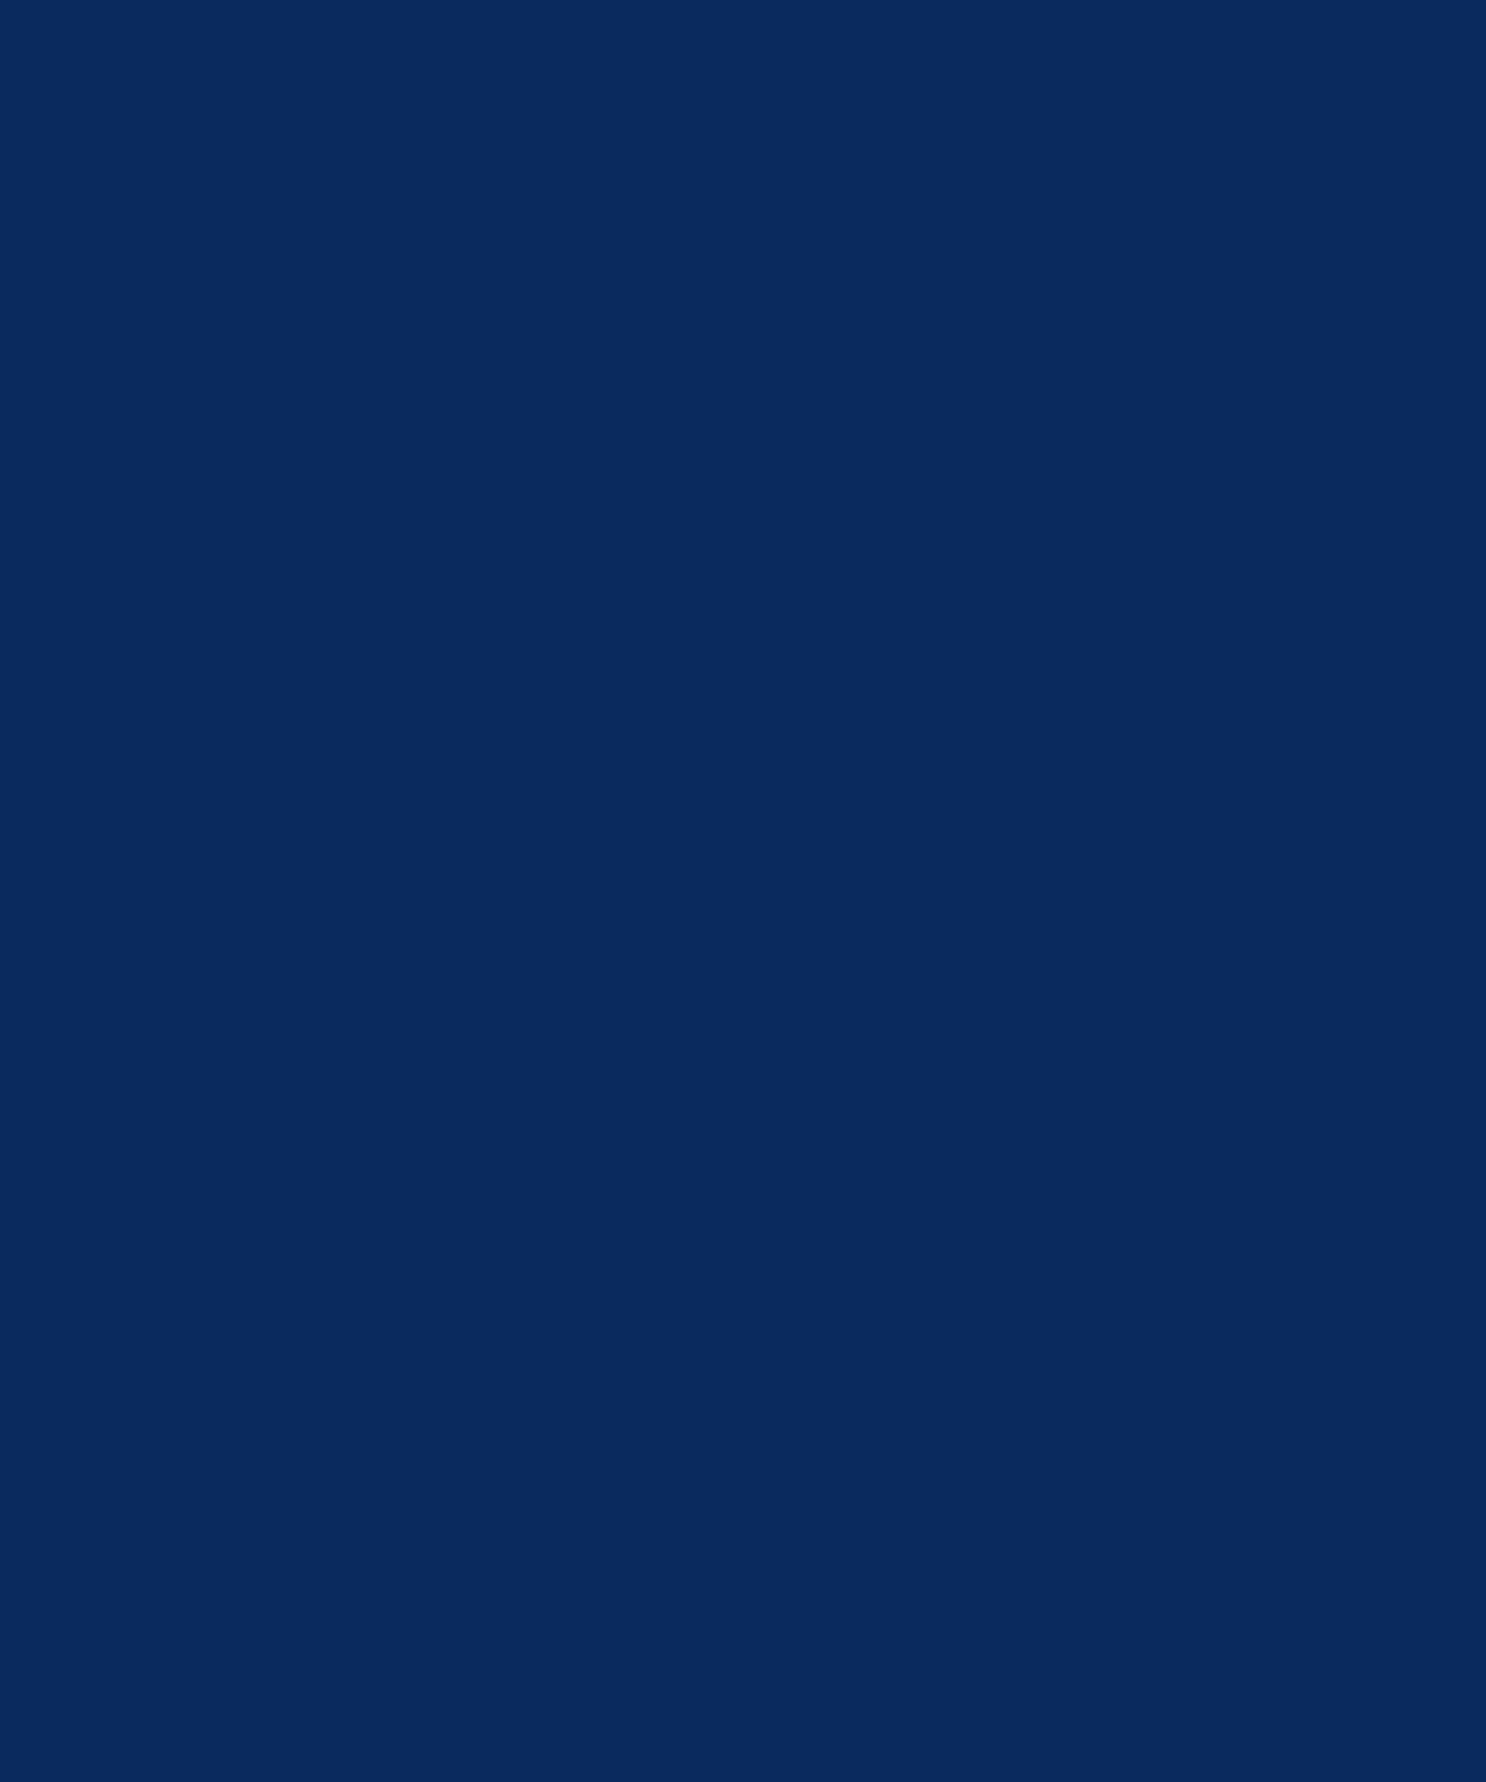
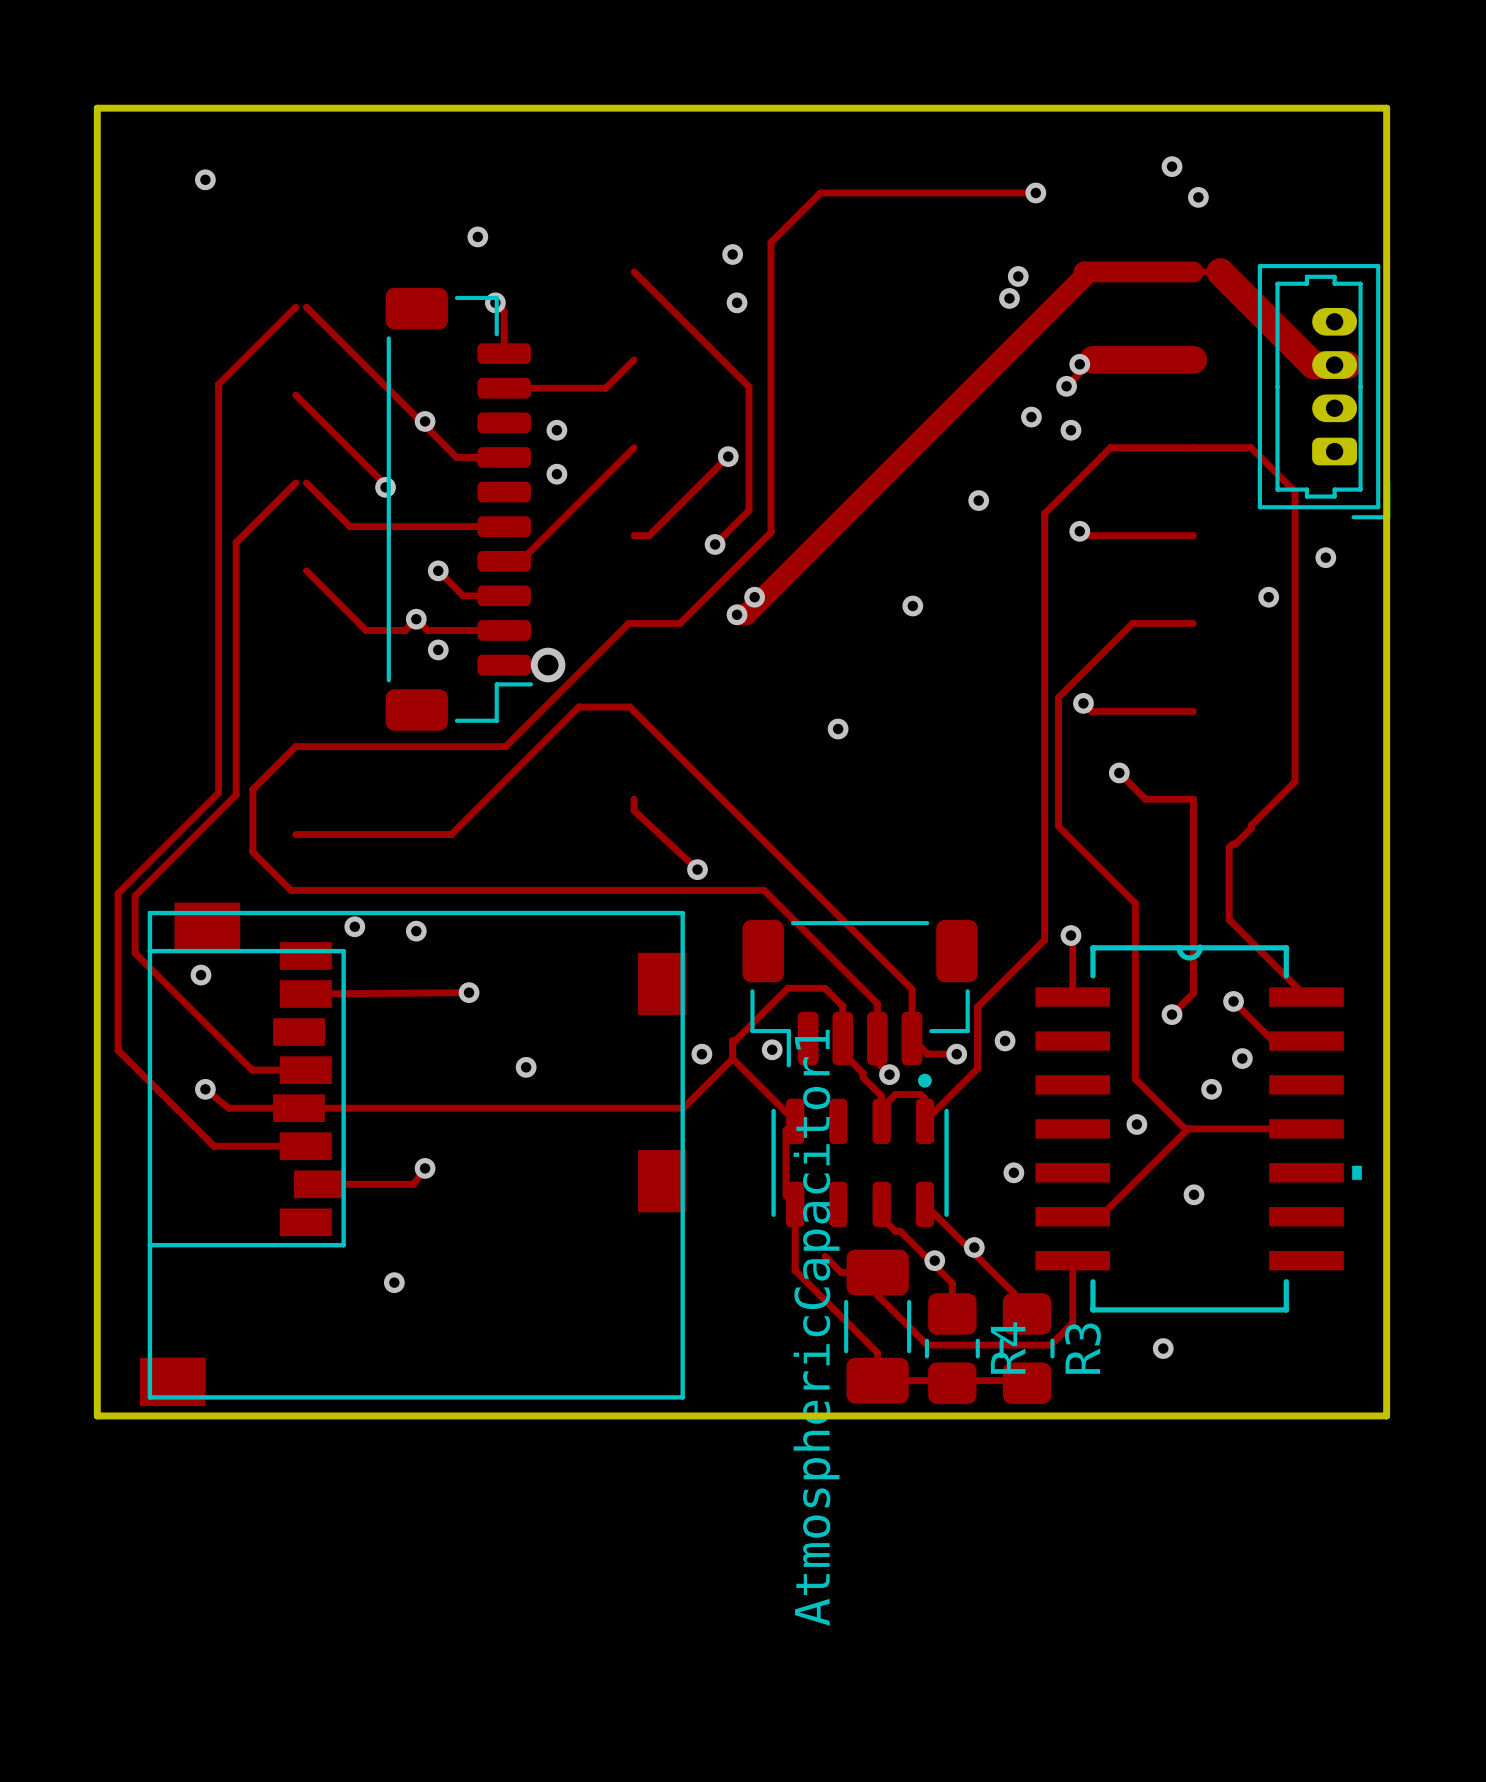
board edge: none -> (97, 108) (1386, 108) (1386, 1415) (97, 1415) (97, 108)
via: none -> (1172, 166)
via: none -> (205, 179)
track: none -> (1035, 192) (820, 192) (770, 242) (770, 532) (680, 623) (628, 623) (505, 746) (295, 746) (252, 789) (252, 852) (291, 890) (764, 890) (877, 1003) (877, 1062) (889, 1074)
via: none -> (1035, 192)
via: none -> (1198, 197)
via: none -> (477, 236)
via: none -> (732, 254)
track: none -> (634, 271) (749, 386) (749, 510) (715, 544)
via: none -> (1018, 276)
via: none -> (1009, 298)
track: none -> (495, 302) (504, 311) (504, 353)
via: none -> (495, 302)
via: none -> (737, 302)
track: none -> (295, 307) (218, 384) (218, 792) (118, 893) (118, 1050) (213, 1146) (305, 1146)
track: none -> (306, 307) (420, 421) (425, 421) (425, 425) (456, 457) (514, 457)
track: none -> (634, 359) (605, 388) (504, 388)
track: none -> (1193, 359) (1093, 359) (1088, 364) (1079, 364) (1079, 373) (1066, 386)
via: none -> (1079, 364)
track: none -> (1347, 365) (1313, 365) (1220, 271) (1084, 271) (1084, 276) (745, 614) (737, 614)
via: none -> (1066, 386)
part: none -> (1324, 391)
track: none -> (295, 395) (385, 484) (385, 487)
via: none -> (1031, 417)
via: none -> (425, 421)
via: none -> (556, 430)
via: none -> (1070, 430)
track: none -> (634, 447) (520, 561) (504, 561)
track: none -> (728, 456) (649, 535) (634, 535)
via: none -> (728, 456)
via: none -> (556, 474)
track: none -> (295, 482) (236, 542) (236, 794) (135, 895) (135, 953) (252, 1070) (305, 1070)
track: none -> (306, 482) (350, 526) (514, 526)
via: none -> (385, 487)
via: none -> (978, 500)
part: none -> (459, 509)
track: none -> (1079, 531) (1084, 535) (1193, 535)
via: none -> (1079, 531)
via: none -> (715, 544)
via: none -> (1325, 557)
track: none -> (306, 570) (366, 630) (405, 630) (416, 619) (427, 630) (514, 630)
track: none -> (438, 570) (463, 595) (504, 595)
via: none -> (438, 570)
via: none -> (754, 597)
via: none -> (1268, 597)
via: none -> (912, 606)
via: none -> (737, 614)
via: none -> (416, 619)
track: none -> (1193, 623) (1132, 623) (1058, 697) (1058, 826) (1135, 903) (1135, 1079) (1185, 1128) (1306, 1128)
via: none -> (438, 649)
via: none -> (548, 665)
track: none -> (1083, 703) (1091, 711) (1193, 711)
via: none -> (1083, 703)
via: none -> (838, 729)
track: none -> (1119, 772) (1145, 799) (1193, 799) (1193, 993) (1172, 1014)
via: none -> (1119, 772)
track: none -> (634, 799) (634, 810) (697, 869)
track: none -> (295, 834) (451, 834) (578, 707) (629, 707) (911, 989) (911, 1038) (927, 1054) (956, 1054)
via: none -> (697, 869)
via: none -> (354, 926)
via: none -> (416, 931)
via: none -> (1070, 935)
track: none -> (1070, 939) (1070, 935) (1072, 941) (1072, 997)
via: none -> (201, 975)
track: none -> (469, 992) (305, 994)
via: none -> (469, 992)
part: none -> (860, 993)
track: none -> (1306, 997) (1229, 919) (1229, 847) (1235, 844) (1295, 781) (1295, 491) (1251, 447) (1110, 447) (1044, 513) (1044, 939) (977, 1007) (977, 1068) (924, 1121) (924, 1098) (920, 1094) (895, 1094) (881, 1108)
track: none -> (1233, 1001) (1273, 1040) (1306, 1040)
via: none -> (1233, 1001)
via: none -> (1172, 1014)
via: none -> (1005, 1040)
via: none -> (772, 1049)
track: none -> (842, 1052) (863, 1073) (863, 1077) (881, 1096) (881, 1121)
via: none -> (701, 1054)
via: none -> (956, 1054)
track: none -> (732, 1058) (683, 1108) (228, 1108) (205, 1089)
track: none -> (732, 1058) (795, 1121) (786, 1130) (786, 1195) (795, 1204) (795, 1270) (877, 1352) (877, 1380) (1024, 1380) (1027, 1383)
track: none -> (842, 1058) (842, 1006) (824, 988) (787, 988) (735, 1040) (732, 1040) (732, 1058)
via: none -> (1242, 1058)
via: none -> (526, 1067)
via: none -> (889, 1074)
via: none -> (205, 1089)
via: none -> (1211, 1089)
via: none -> (1136, 1124)
track: none -> (1188, 1128) (1100, 1216) (1072, 1216)
part: none -> (1198, 1128)
part: none -> (860, 1150)
part: none -> (413, 1154)
track: none -> (425, 1168) (413, 1184) (319, 1184)
via: none -> (425, 1168)
via: none -> (1013, 1172)
via: none -> (1194, 1194)
track: none -> (881, 1204) (881, 1217) (895, 1231) (900, 1231) (929, 1260) (934, 1260) (934, 1265) (952, 1283) (952, 1313)
track: none -> (924, 1204) (968, 1247) (974, 1247) (974, 1253) (1027, 1306) (1027, 1313)
via: none -> (974, 1247)
track: none -> (824, 1256) (841, 1272) (877, 1272) (877, 1295) (927, 1345) (1050, 1345) (1072, 1323) (1072, 1260)
via: none -> (934, 1260)
via: none -> (394, 1282)
AtmosphericCapacitor1: none -> (877, 1326)
R4: none -> (952, 1348)
R3: none -> (1027, 1348)
via: none -> (1163, 1348)

